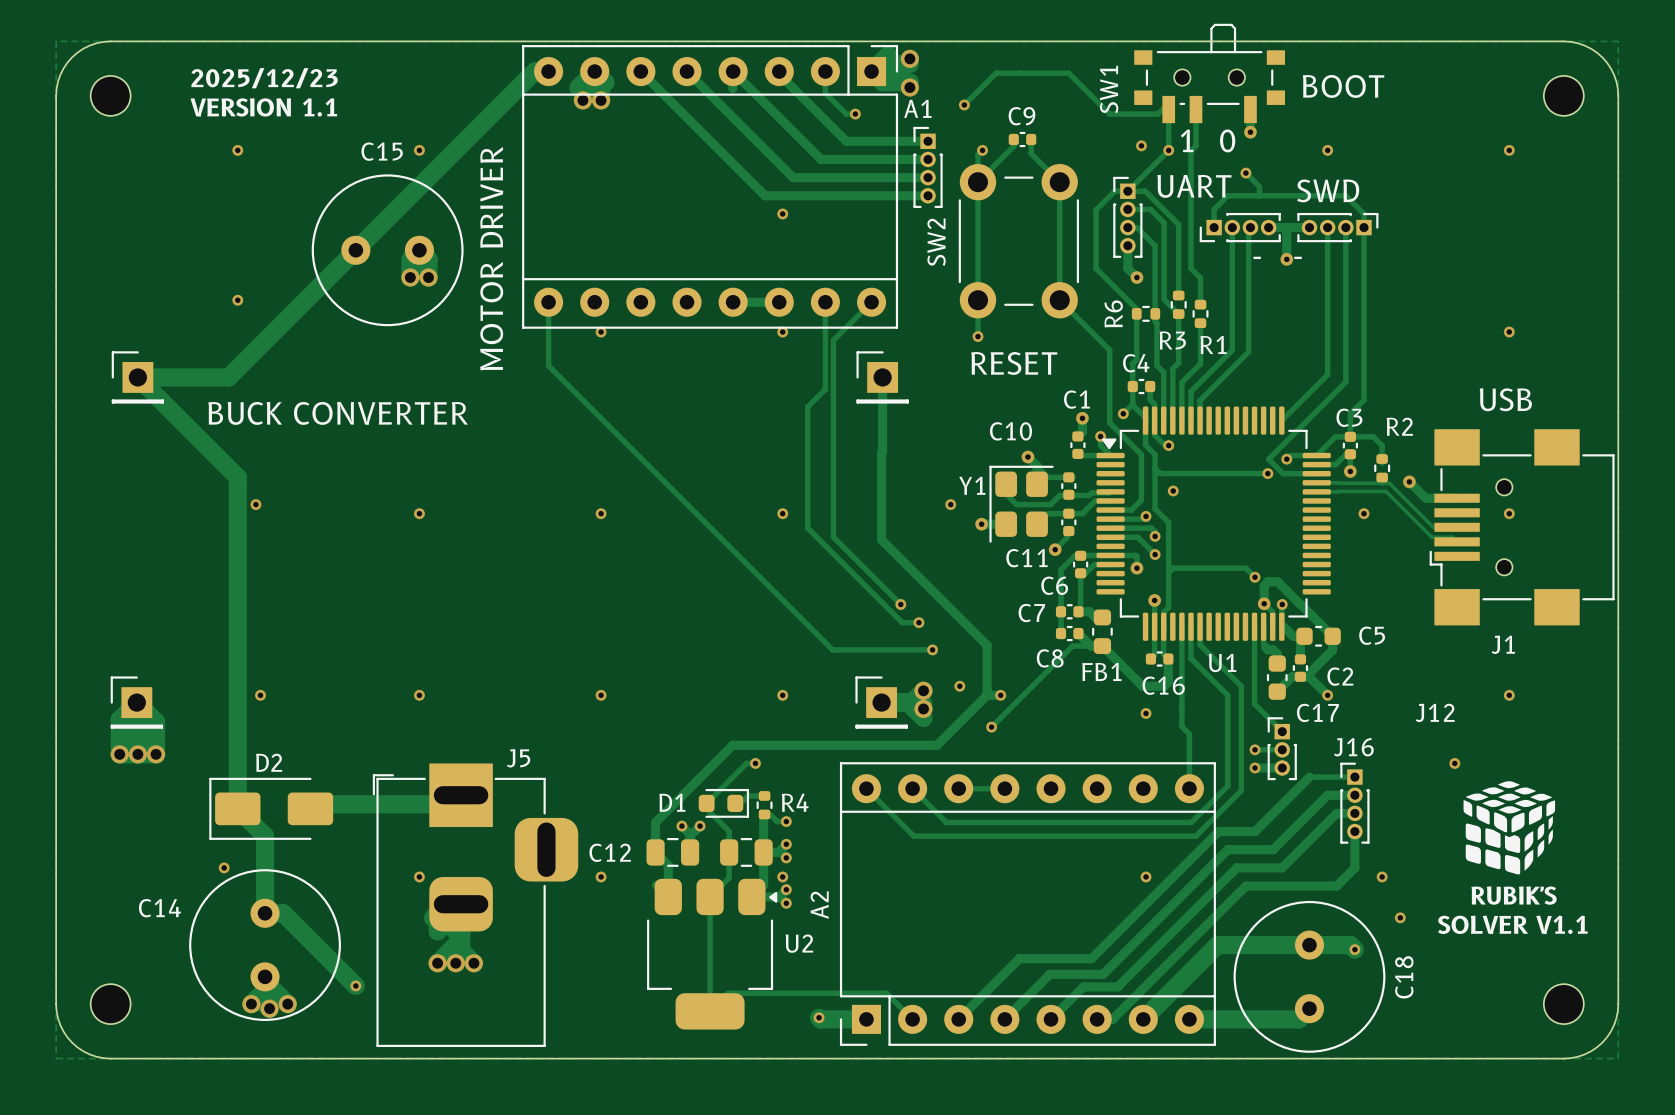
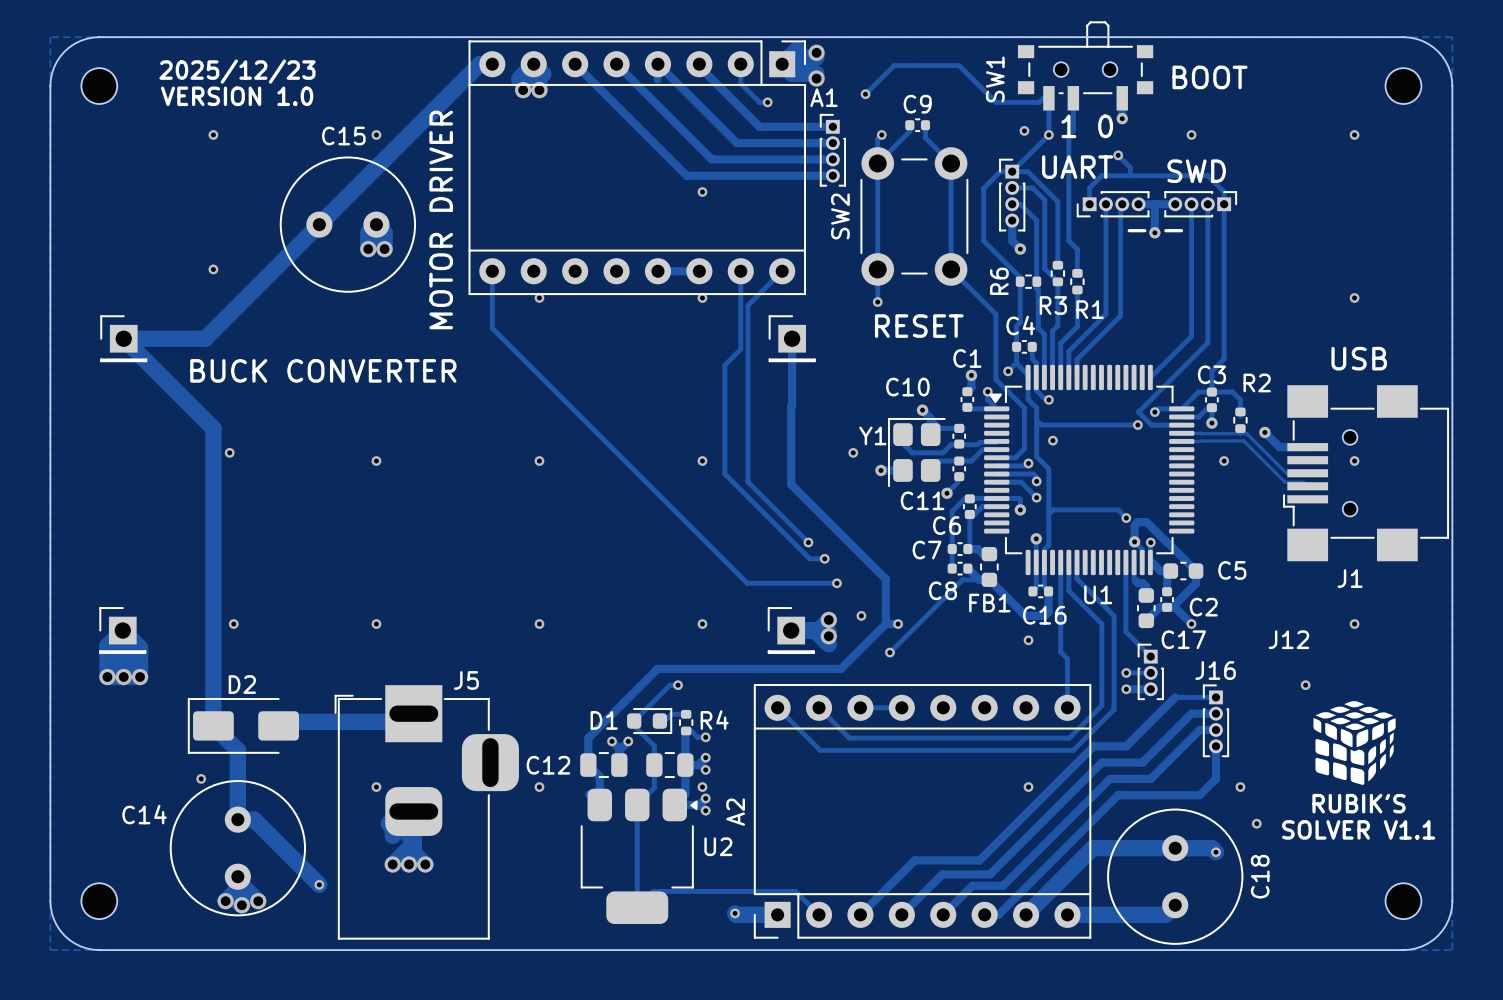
text: VERSION 1.1 (263, 107) -> VERSION 1.0 (237, 96)

